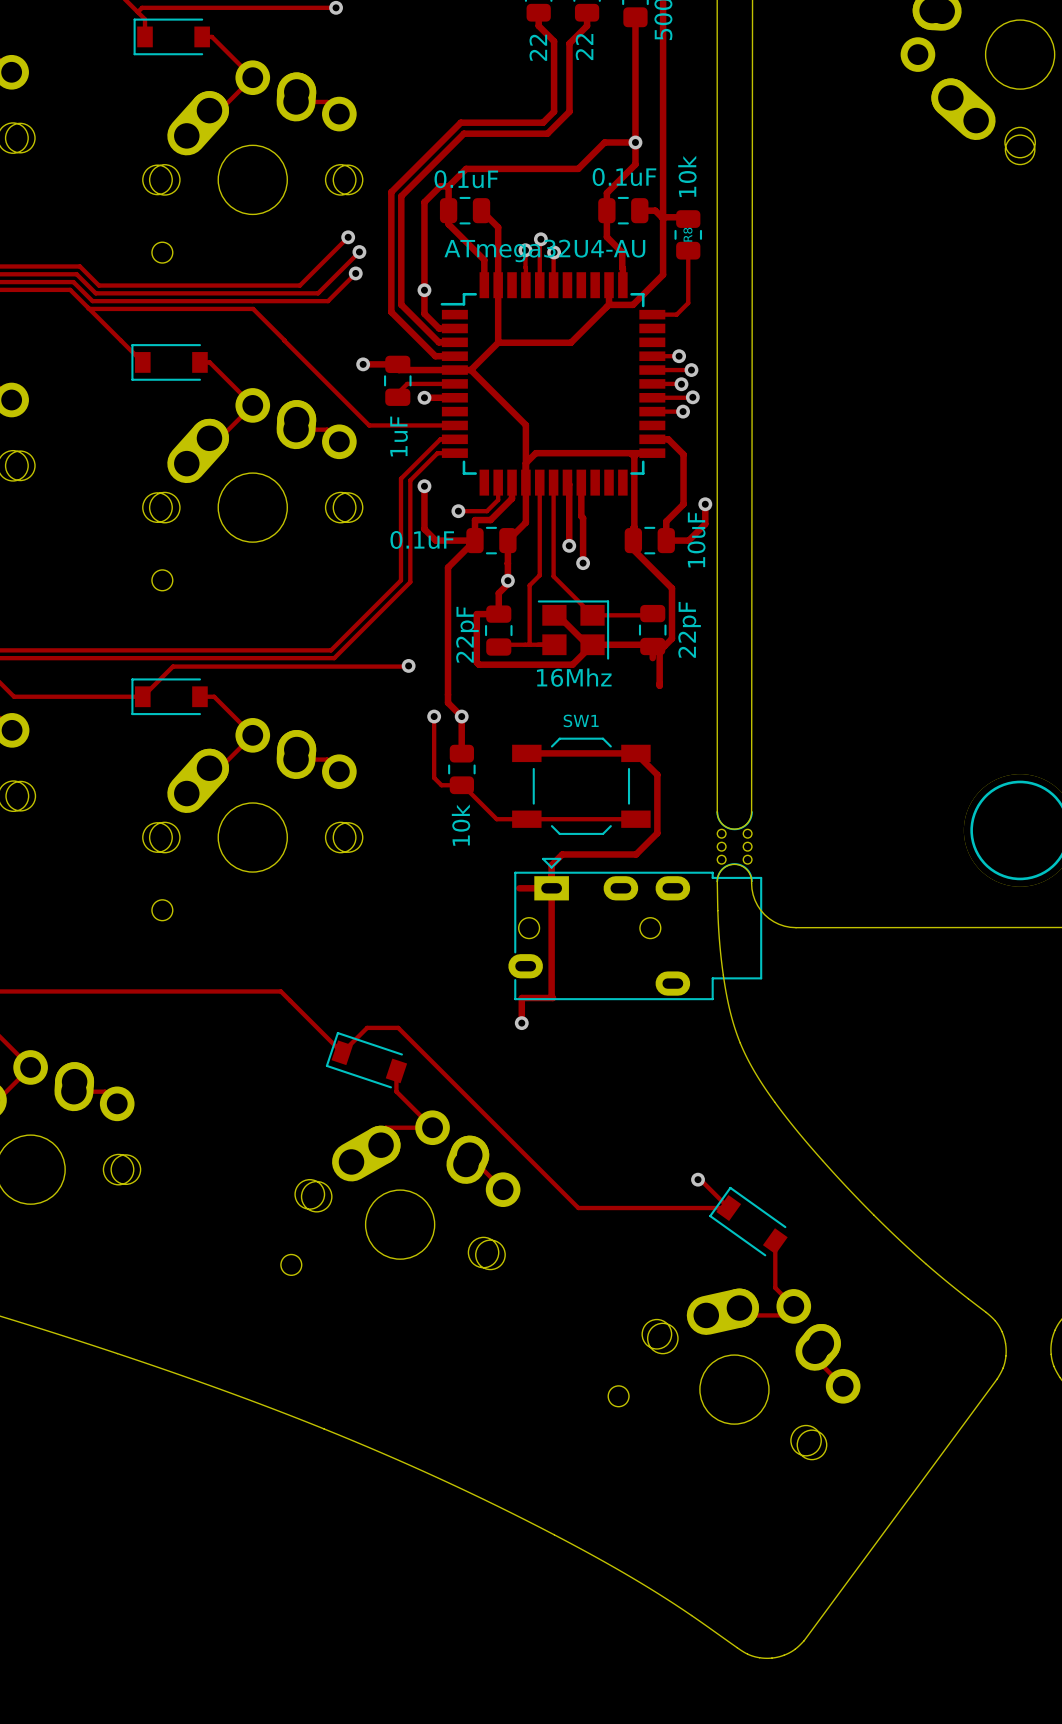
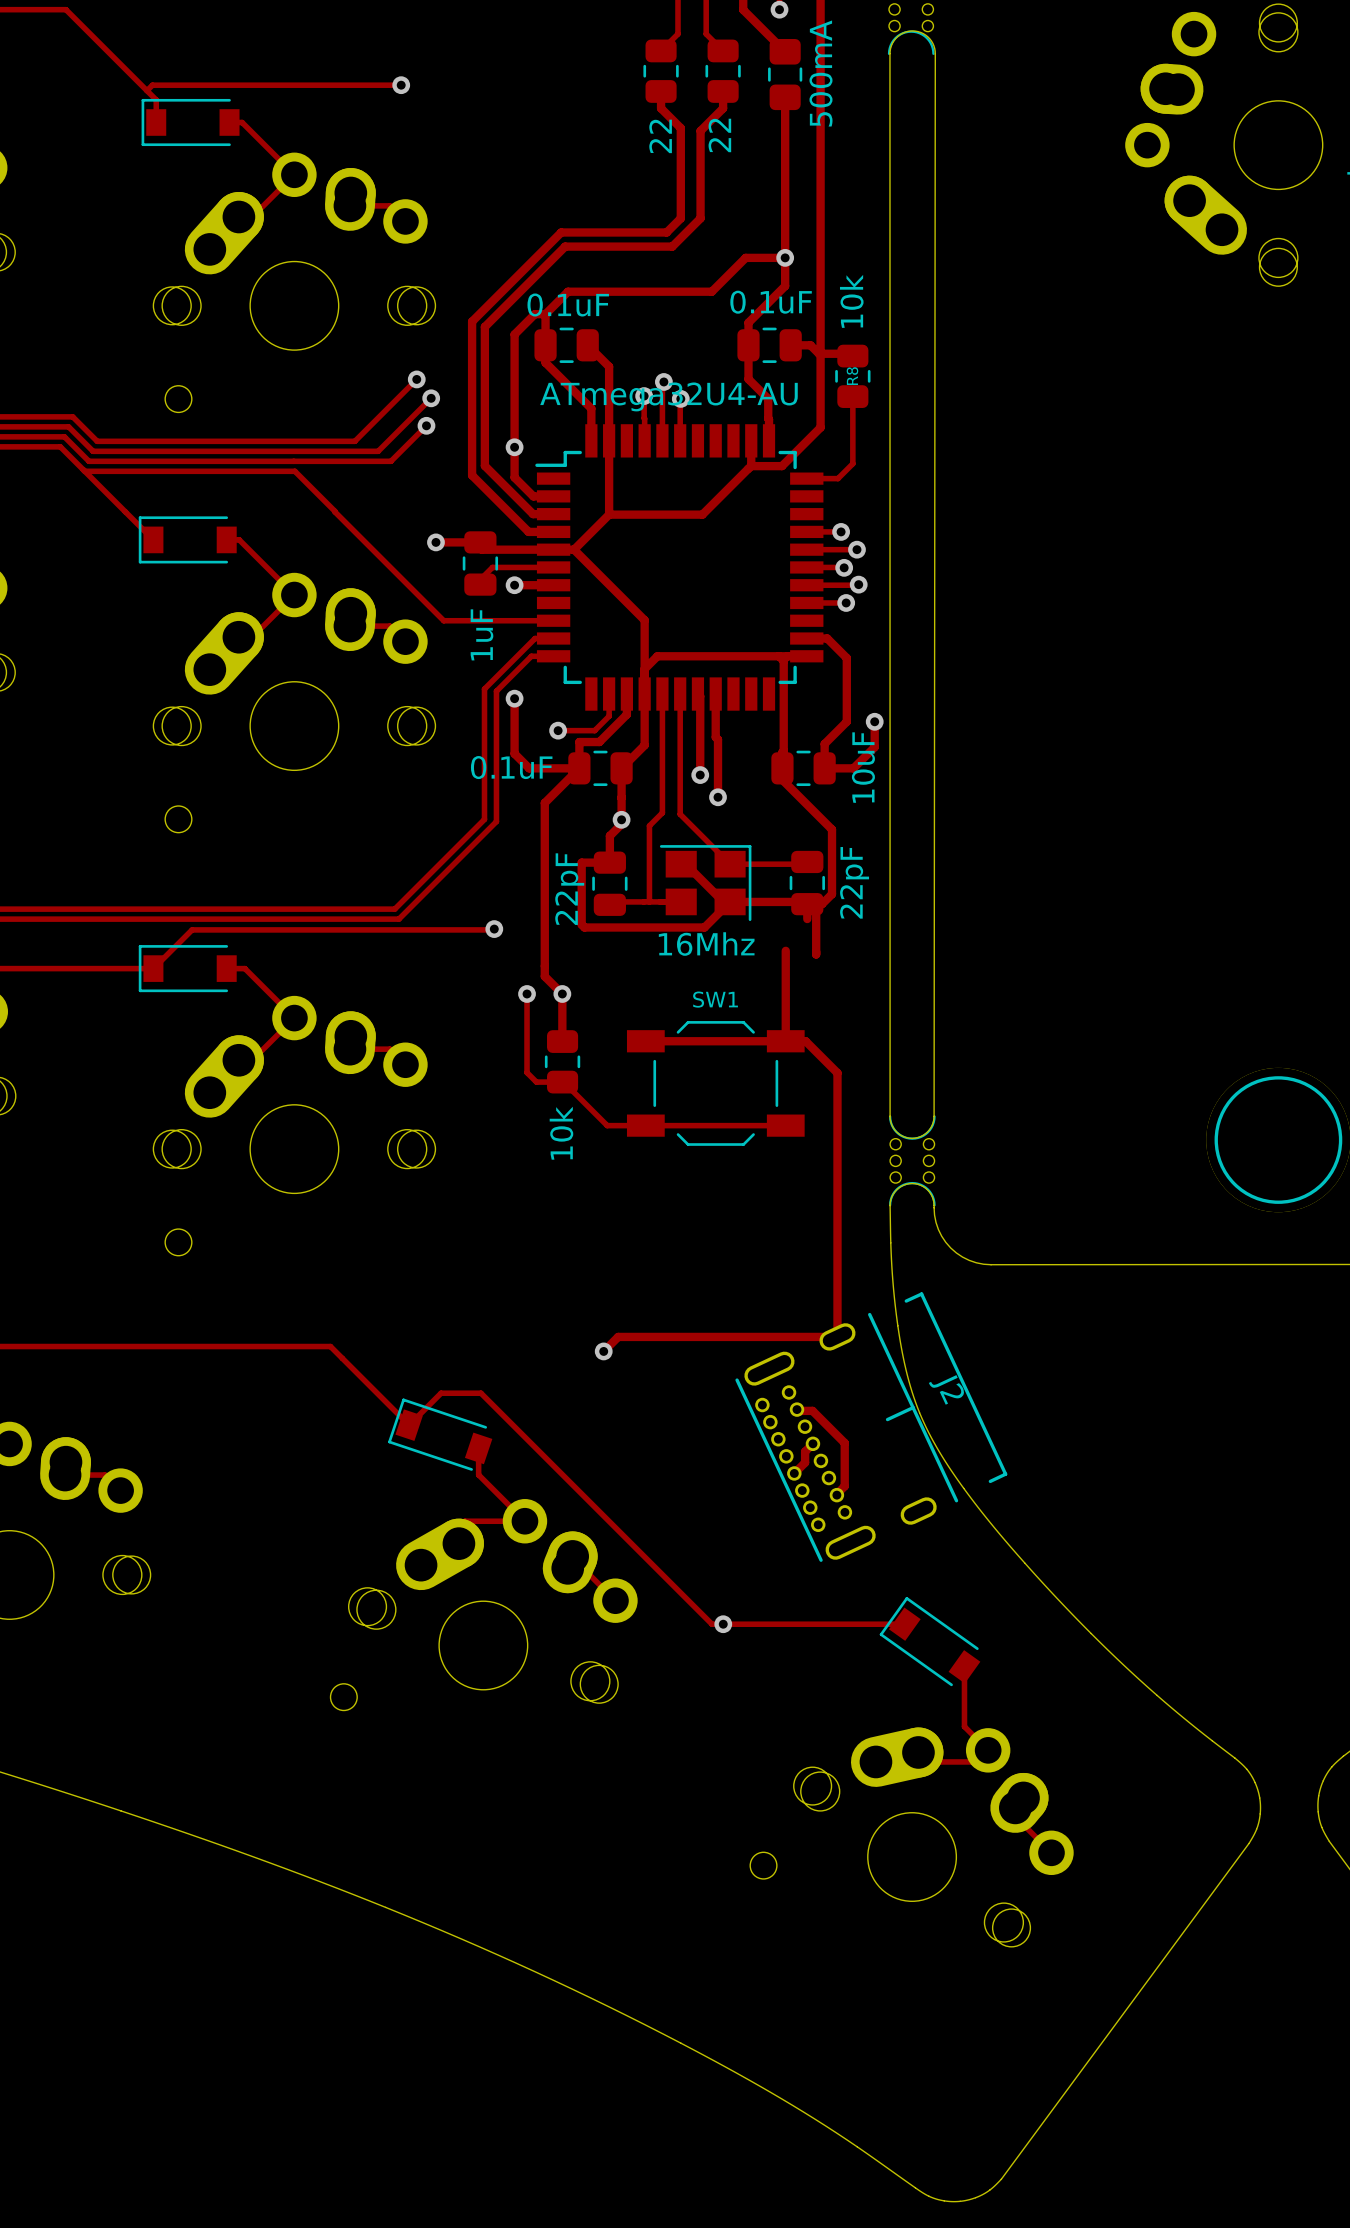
track: none -> (785, 950) (785, 1041) (805, 1041) (837, 1073) (837, 1336) (618, 1336) (603, 1351)
track: (635, 753) (657, 774) (657, 833) (636, 854) (562, 854) (551, 865) (552, 998) (521, 998) (521, 1023) -> none
track: (519, 888) (551, 888) -> none
part: (635, 929) -> none
via position: (521, 1023) -> (603, 1351)
track: none -> (797, 1407) (798, 1410) (812, 1410) (844, 1443) (844, 1486) (836, 1495)
J2: none -> (871, 1427)
track: none -> (812, 1443) (805, 1451) (805, 1462) (794, 1473)
track: (698, 1179) (700, 1179) (728, 1208) -> none
via: (698, 1179) -> none
via: none -> (723, 1624)

